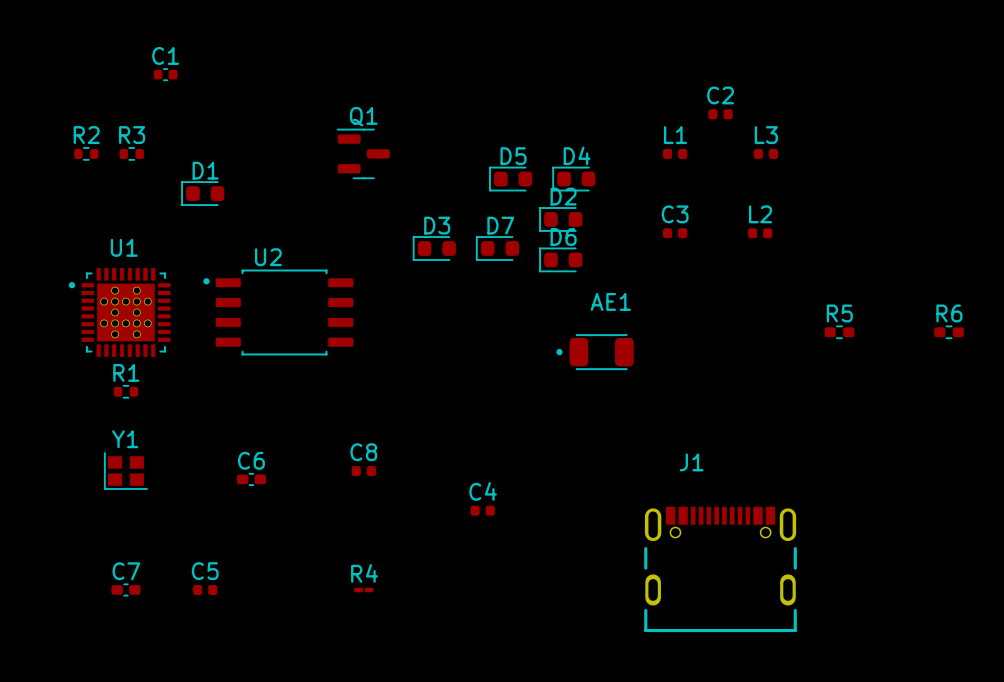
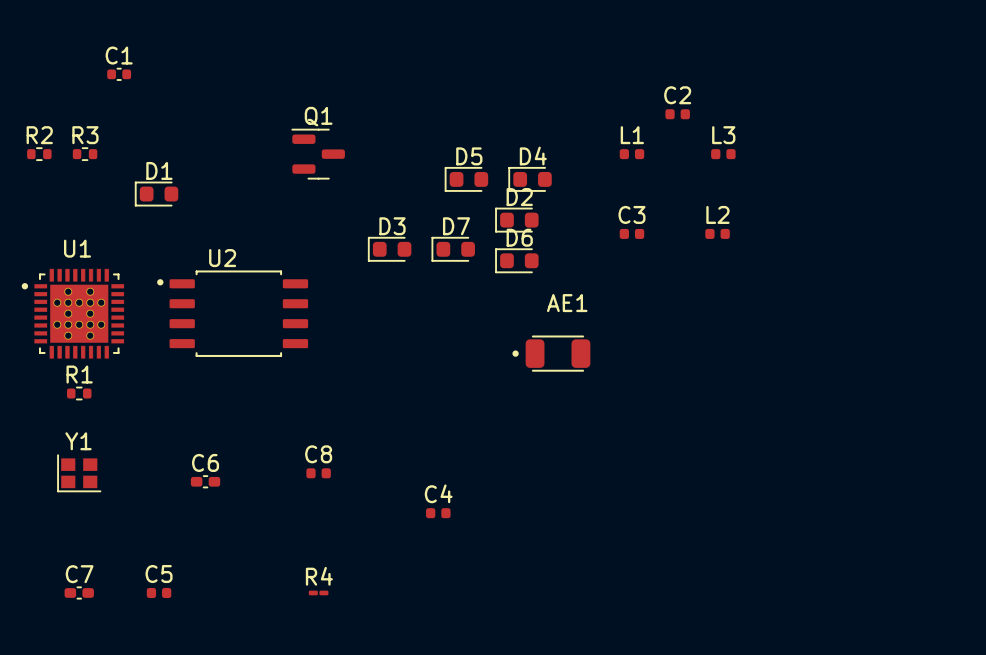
R5: (839, 332) -> none
R6: (949, 332) -> none
J1: (720, 569) -> none

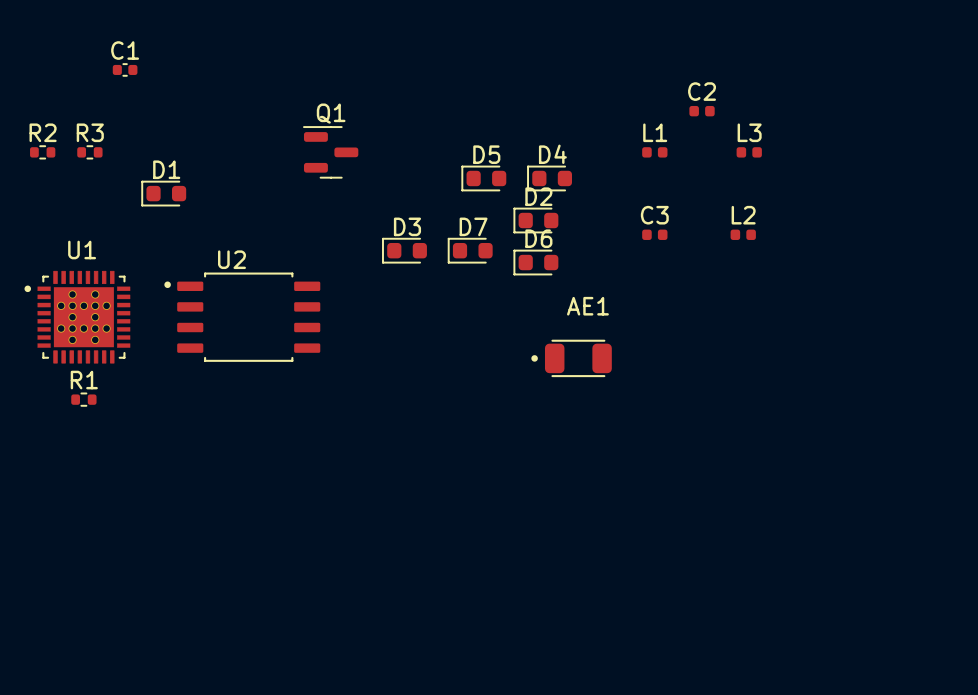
Y1: (79, 473) -> none
C8: (318, 473) -> none
C6: (205, 481) -> none
C4: (438, 513) -> none
C7: (79, 592) -> none
C5: (159, 592) -> none
R4: (318, 592) -> none

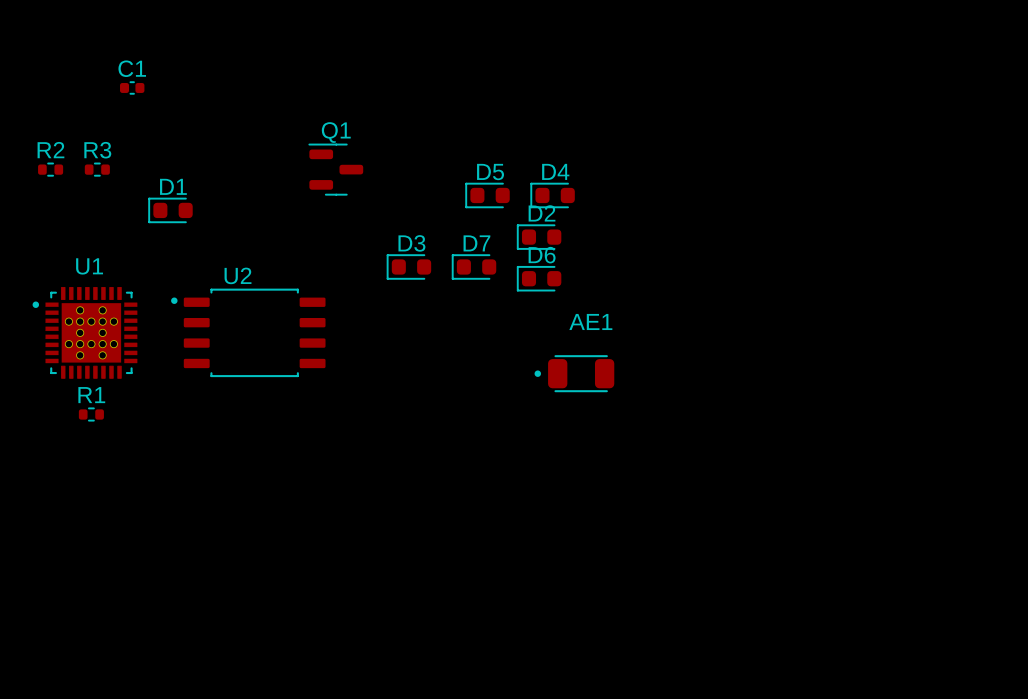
C2: (702, 111) -> none
L1: (654, 152) -> none
L3: (749, 152) -> none
C3: (654, 234) -> none
L2: (743, 234) -> none

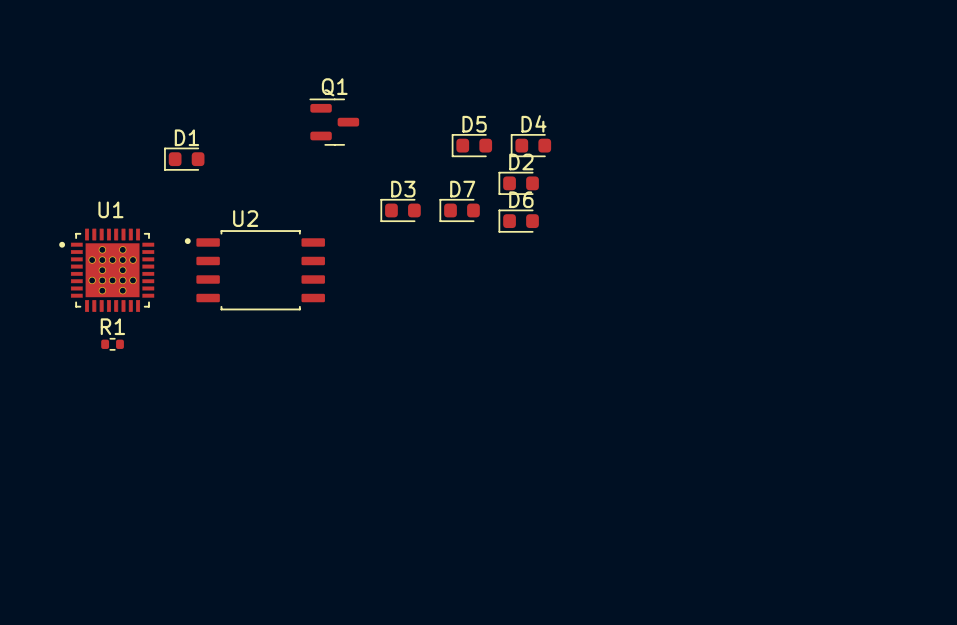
C1: (132, 87) -> none
R2: (50, 169) -> none
R3: (97, 169) -> none
AE1: (574, 373) -> none

